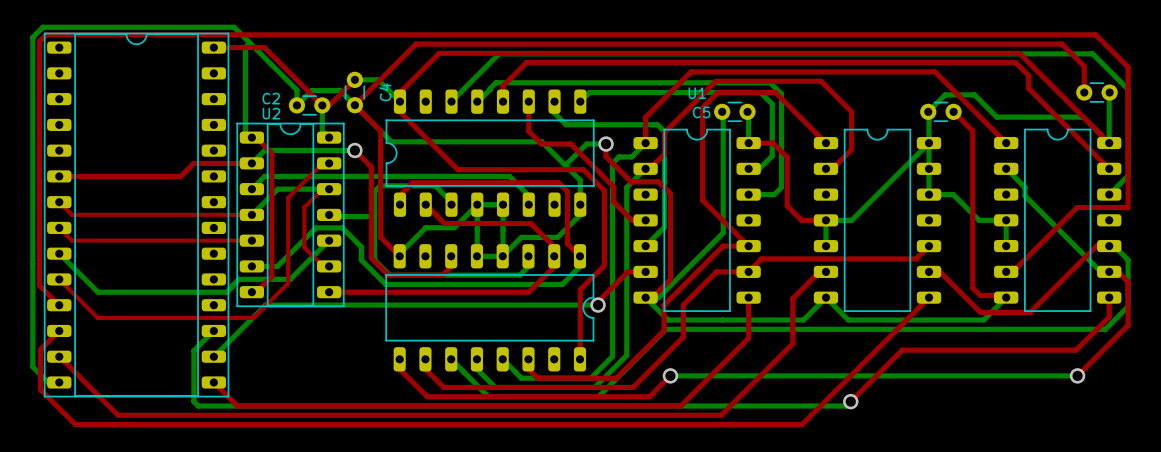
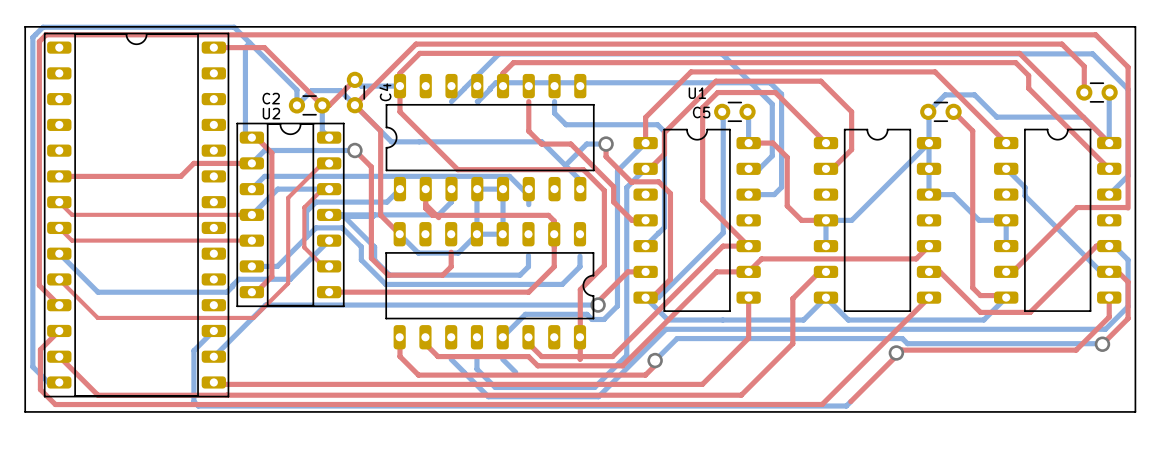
board edge: none -> (25, 26) (1135, 26) (1135, 411) (25, 411) (25, 26)
top track: (439, 53) (399, 92) -> (439, 53) (419, 53) (399, 73) (399, 92)
top track: (526, 62) (503, 86) (503, 101) -> (526, 62) (513, 62) (503, 73) (503, 86)
bottom track: (354, 79) (378, 79) (399, 101) -> (354, 79) (361, 86) (399, 86)
bottom track: (760, 92) (589, 92) (580, 101) -> (760, 92) (721, 53)
bottom track: (645, 143) (631, 156) (618, 156) (612, 163) (612, 356) (590, 378) (521, 378) (515, 372) -> (645, 143) (617, 171) (617, 306) (604, 319) (592, 319) (586, 314) (525, 314) (502, 337)
part position: (490, 153) -> (490, 137)
bottom track: none -> (399, 189) (387, 202) (315, 202) (306, 211) (306, 237)
bottom track: none -> (451, 189) (451, 202) (438, 214) (329, 214)
bottom track: (580, 189) (580, 214) (557, 237) (521, 237) (502, 256) -> none
top track: (399, 204) (399, 195) (412, 182) (558, 182) (567, 191) (567, 243) (580, 256) -> none
bottom track: (451, 204) (451, 202) (435, 185) (380, 185) (374, 191) (374, 247) -> (342, 214) (374, 247)
bottom track: (477, 204) (454, 227) (425, 227) (399, 253) (399, 256) -> none
bottom track: (503, 204) (477, 204) (476, 256) (502, 256) (503, 233) -> (477, 233) (503, 233)
bottom track: none -> (503, 204) (503, 189) (476, 189) (476, 234) (458, 253) (418, 253) (399, 234)
top track: (380, 215) (380, 237) (399, 256) -> (380, 215) (399, 234)
top track: (438, 217) (444, 223) (530, 223) (554, 246) -> (425, 189) (425, 208) (432, 215) (548, 215) (554, 221) (554, 246)
top track: (664, 305) (664, 330) (616, 378) (537, 378) (528, 369) (529, 359) -> (664, 305) (612, 356) (541, 356) (528, 343) (529, 338)
top track: (683, 305) (683, 337) (633, 387) (443, 387) (425, 369) (425, 359) -> (683, 305) (622, 365) (537, 365) (528, 356) (438, 356) (425, 343) (425, 337)
part position: (489, 307) -> (489, 285)
top track: (1128, 318) (1128, 325) (1077, 375) -> (1128, 318) (1102, 344)
top track: none -> (399, 337) (399, 356) (418, 375) (645, 375) (655, 365) (655, 360)
bottom track: none -> (1102, 344) (907, 343) (902, 338) (677, 338) (655, 360) (651, 356)
via: none -> (896, 352)
top track: (399, 359) (399, 369) (427, 396) (649, 396) (670, 375) -> none
bottom track: (670, 375) (1077, 375) -> none
via position: (670, 375) -> (655, 360)
via position: (1077, 375) -> (1102, 344)
top track: (215, 384) (237, 406) (680, 406) (702, 384) -> (215, 384) (702, 384)
top track: none -> (98, 395) (227, 395)
top track: (741, 395) (721, 415) (118, 415) (98, 395) -> (741, 395) (227, 395)
via: (850, 401) -> none
top track: none -> (55, 404) (230, 404)
top track: (822, 404) (802, 424) (75, 424) (55, 404) -> (822, 404) (230, 404)

